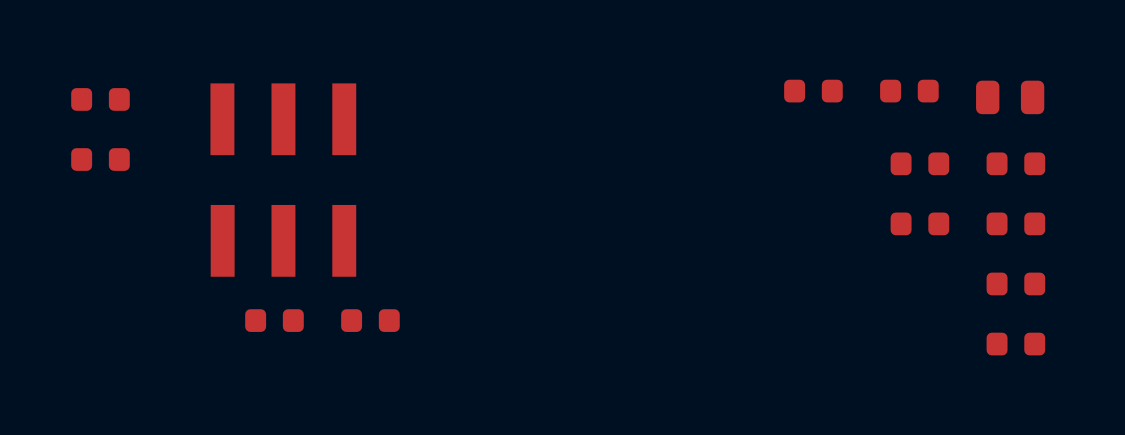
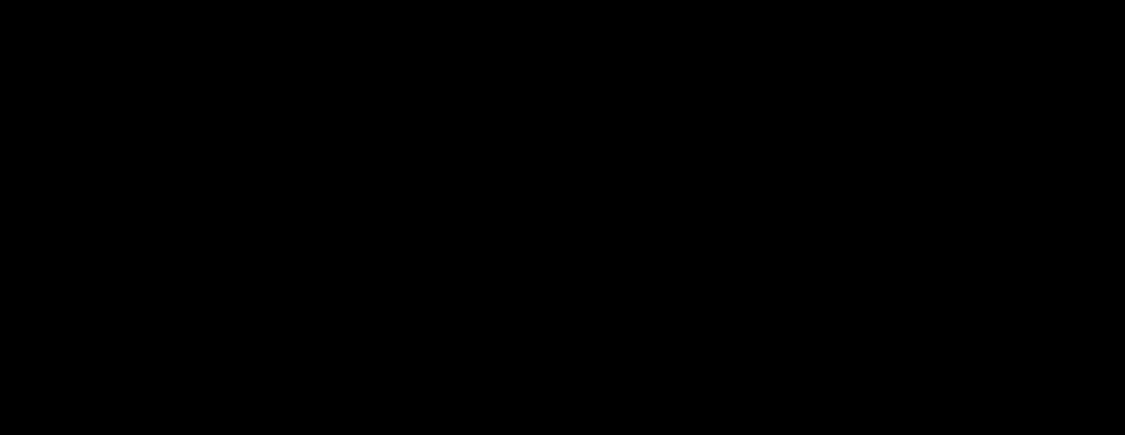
part: (813, 91) -> none
part: (909, 91) -> none
part: (1010, 97) -> none
part: (100, 99) -> none
part: (100, 159) -> none
part: (919, 163) -> none
part: (1015, 163) -> none
part: (283, 180) -> none
part: (919, 223) -> none
part: (1015, 223) -> none
part: (1015, 283) -> none
part: (274, 320) -> none
part: (370, 320) -> none
part: (1015, 344) -> none

